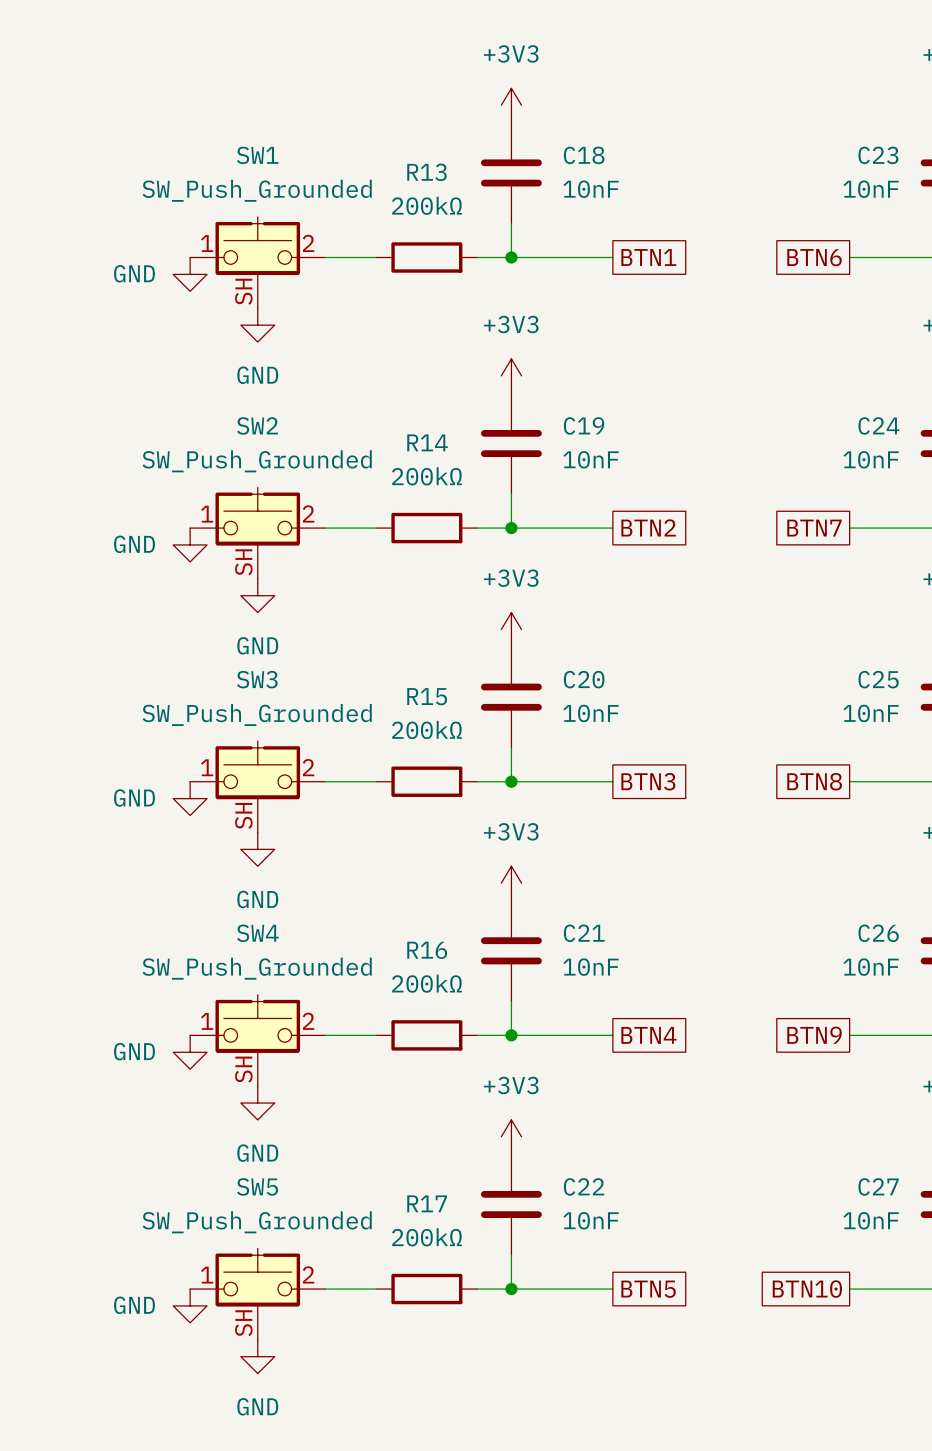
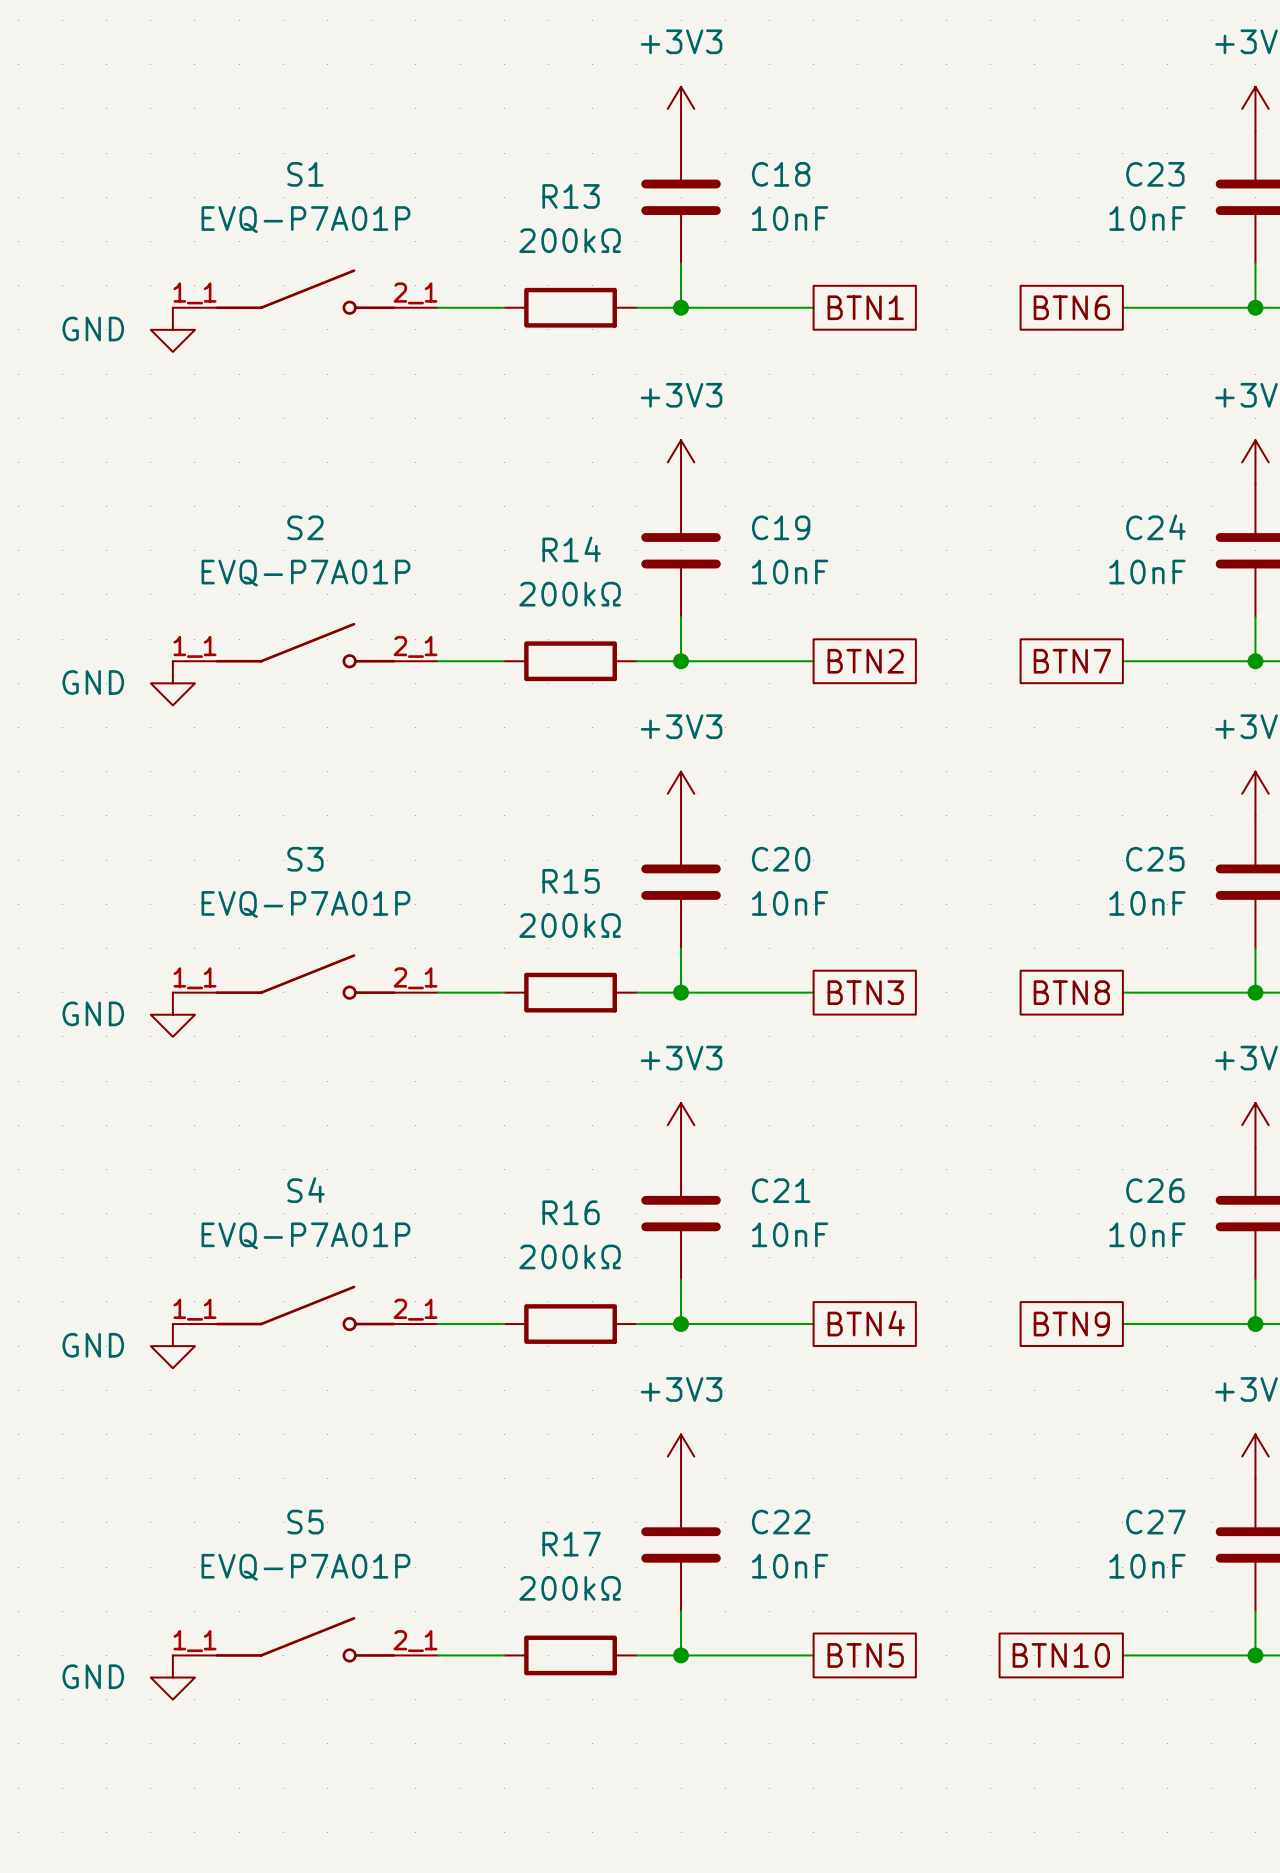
S1: none -> EVQ-P7A01P (305, 292)
SW1: SW_Push_Grounded (257, 262) -> none
power symbol position: GND (190, 274) -> GND (172, 329)
power symbol: GND (257, 325) -> none
S2: none -> EVQ-P7A01P (305, 645)
SW2: SW_Push_Grounded (257, 533) -> none
power symbol position: GND (190, 544) -> GND (172, 683)
power symbol: GND (257, 595) -> none
S3: none -> EVQ-P7A01P (305, 976)
SW3: SW_Push_Grounded (257, 786) -> none
power symbol position: GND (190, 798) -> GND (172, 1014)
power symbol: GND (257, 849) -> none
S4: none -> EVQ-P7A01P (305, 1308)
SW4: SW_Push_Grounded (257, 1040) -> none
power symbol position: GND (190, 1052) -> GND (172, 1346)
power symbol: GND (257, 1103) -> none
S5: none -> EVQ-P7A01P (305, 1639)
SW5: SW_Push_Grounded (257, 1294) -> none
power symbol position: GND (190, 1305) -> GND (172, 1677)
power symbol: GND (257, 1356) -> none

